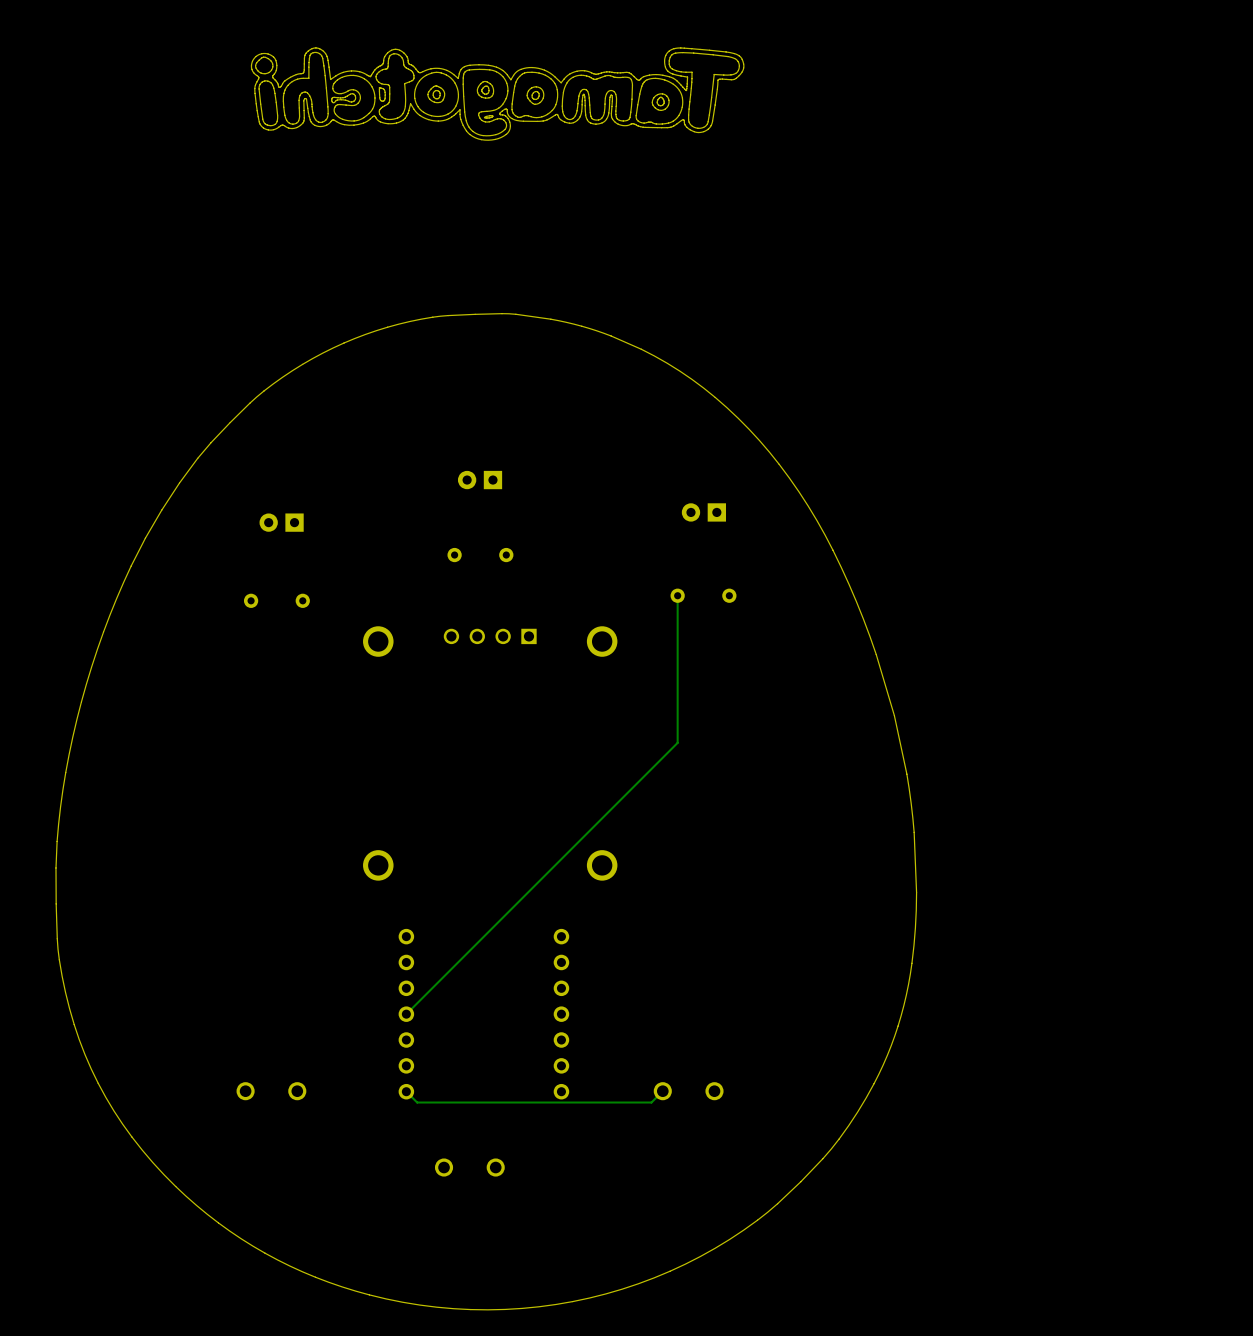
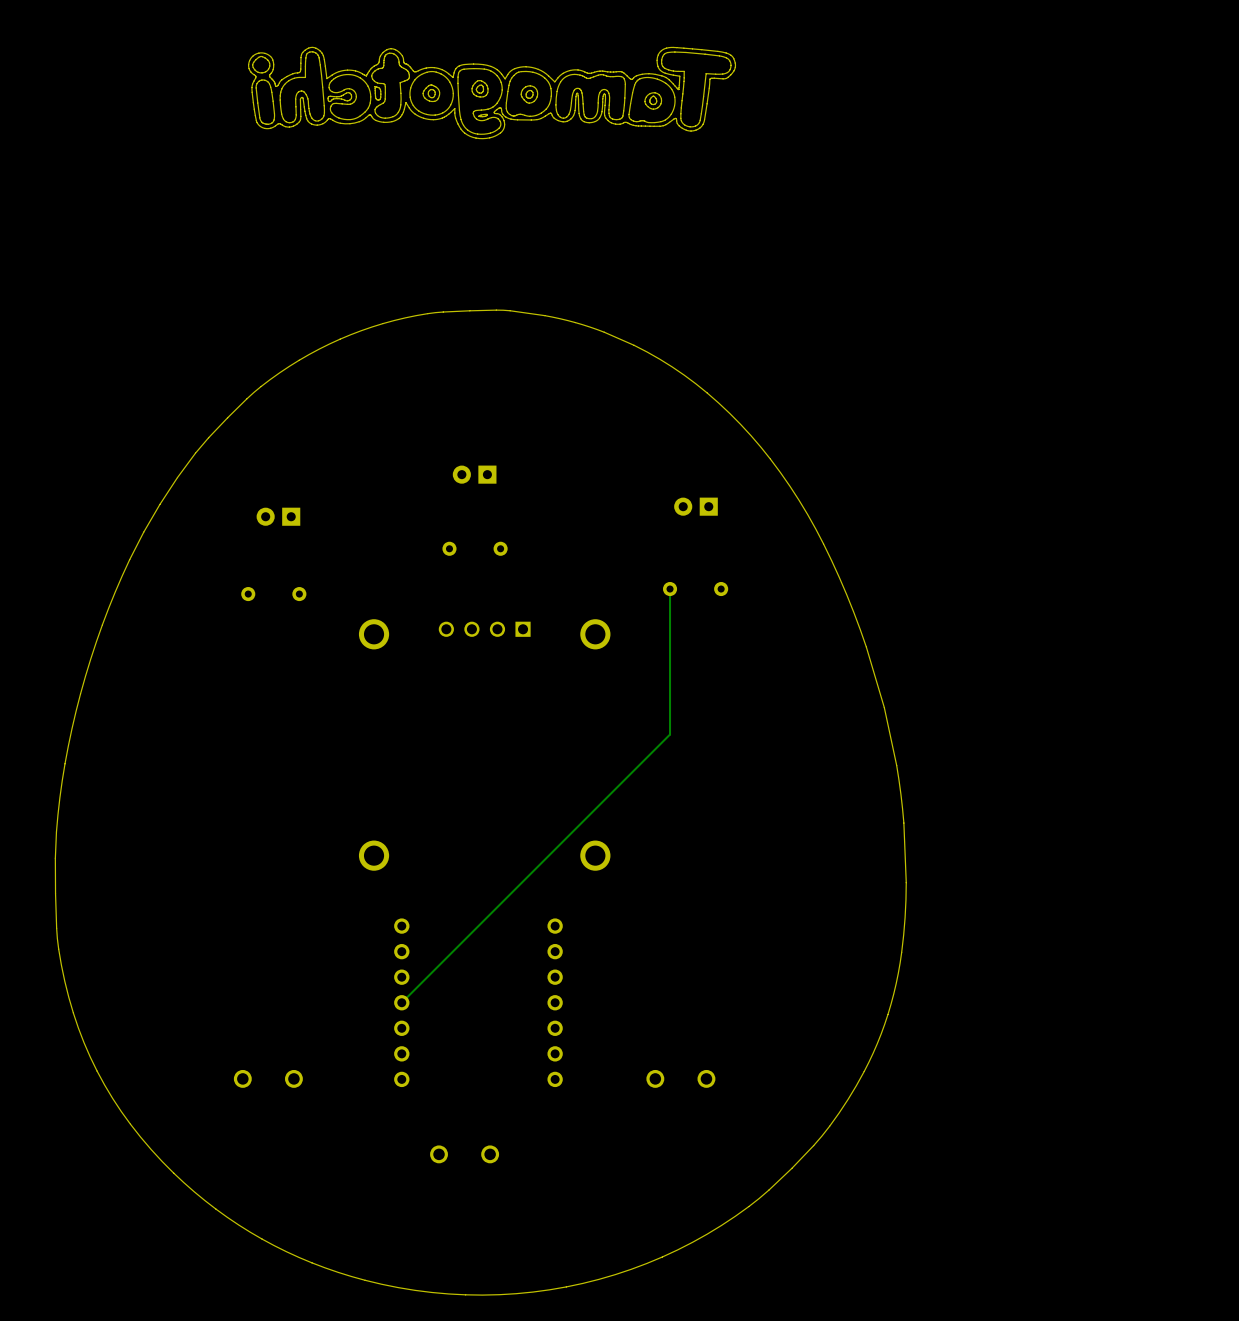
track: (662, 1091) (651, 1102) (417, 1102) (406, 1091) -> none

